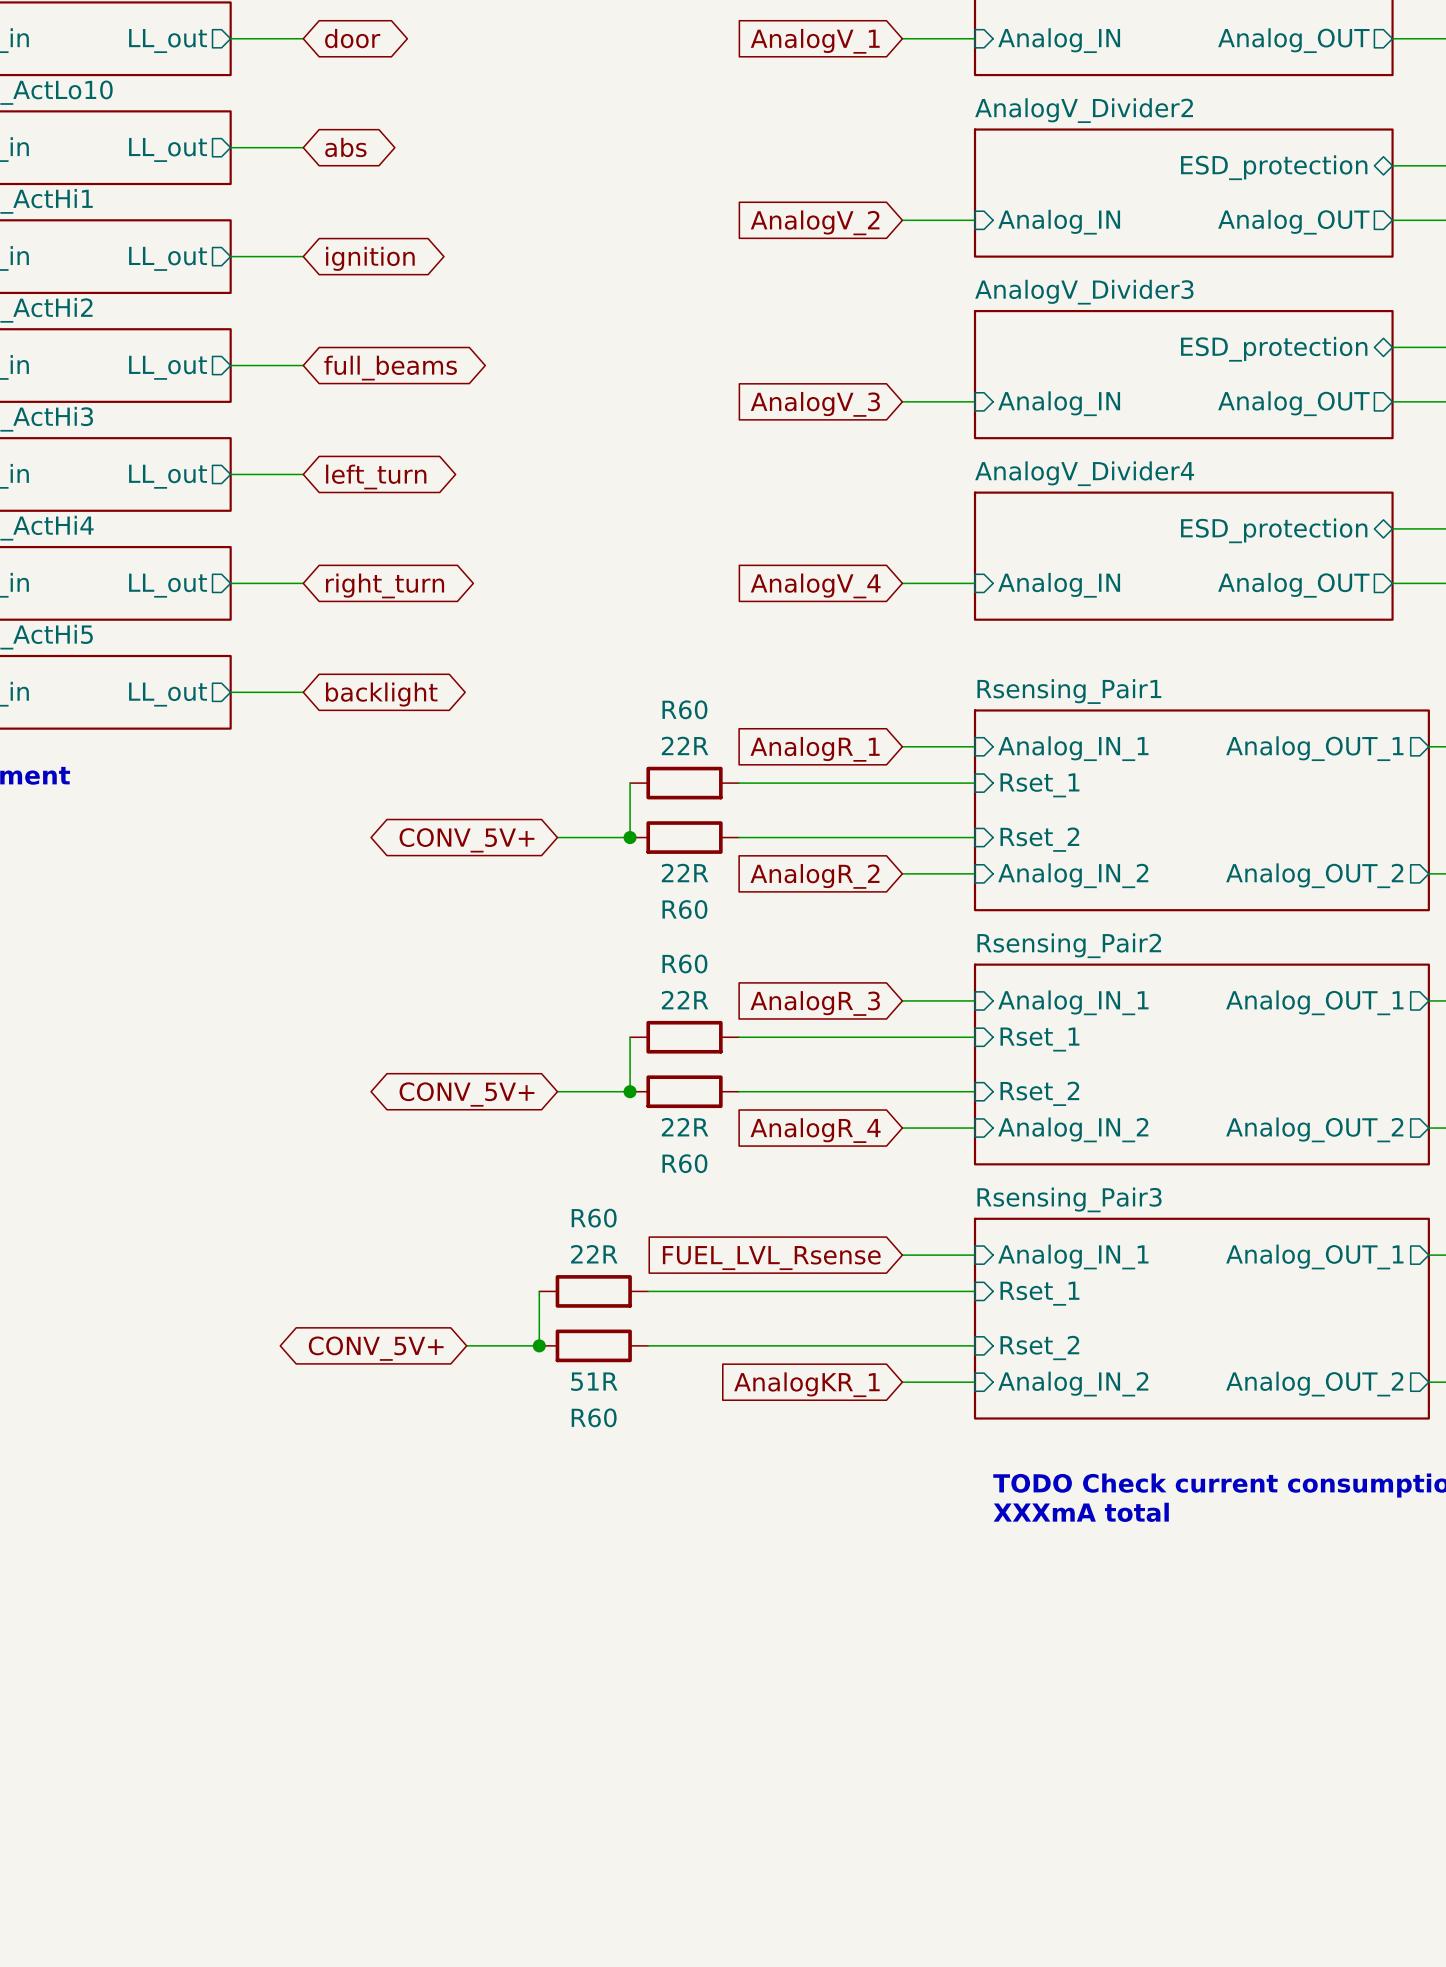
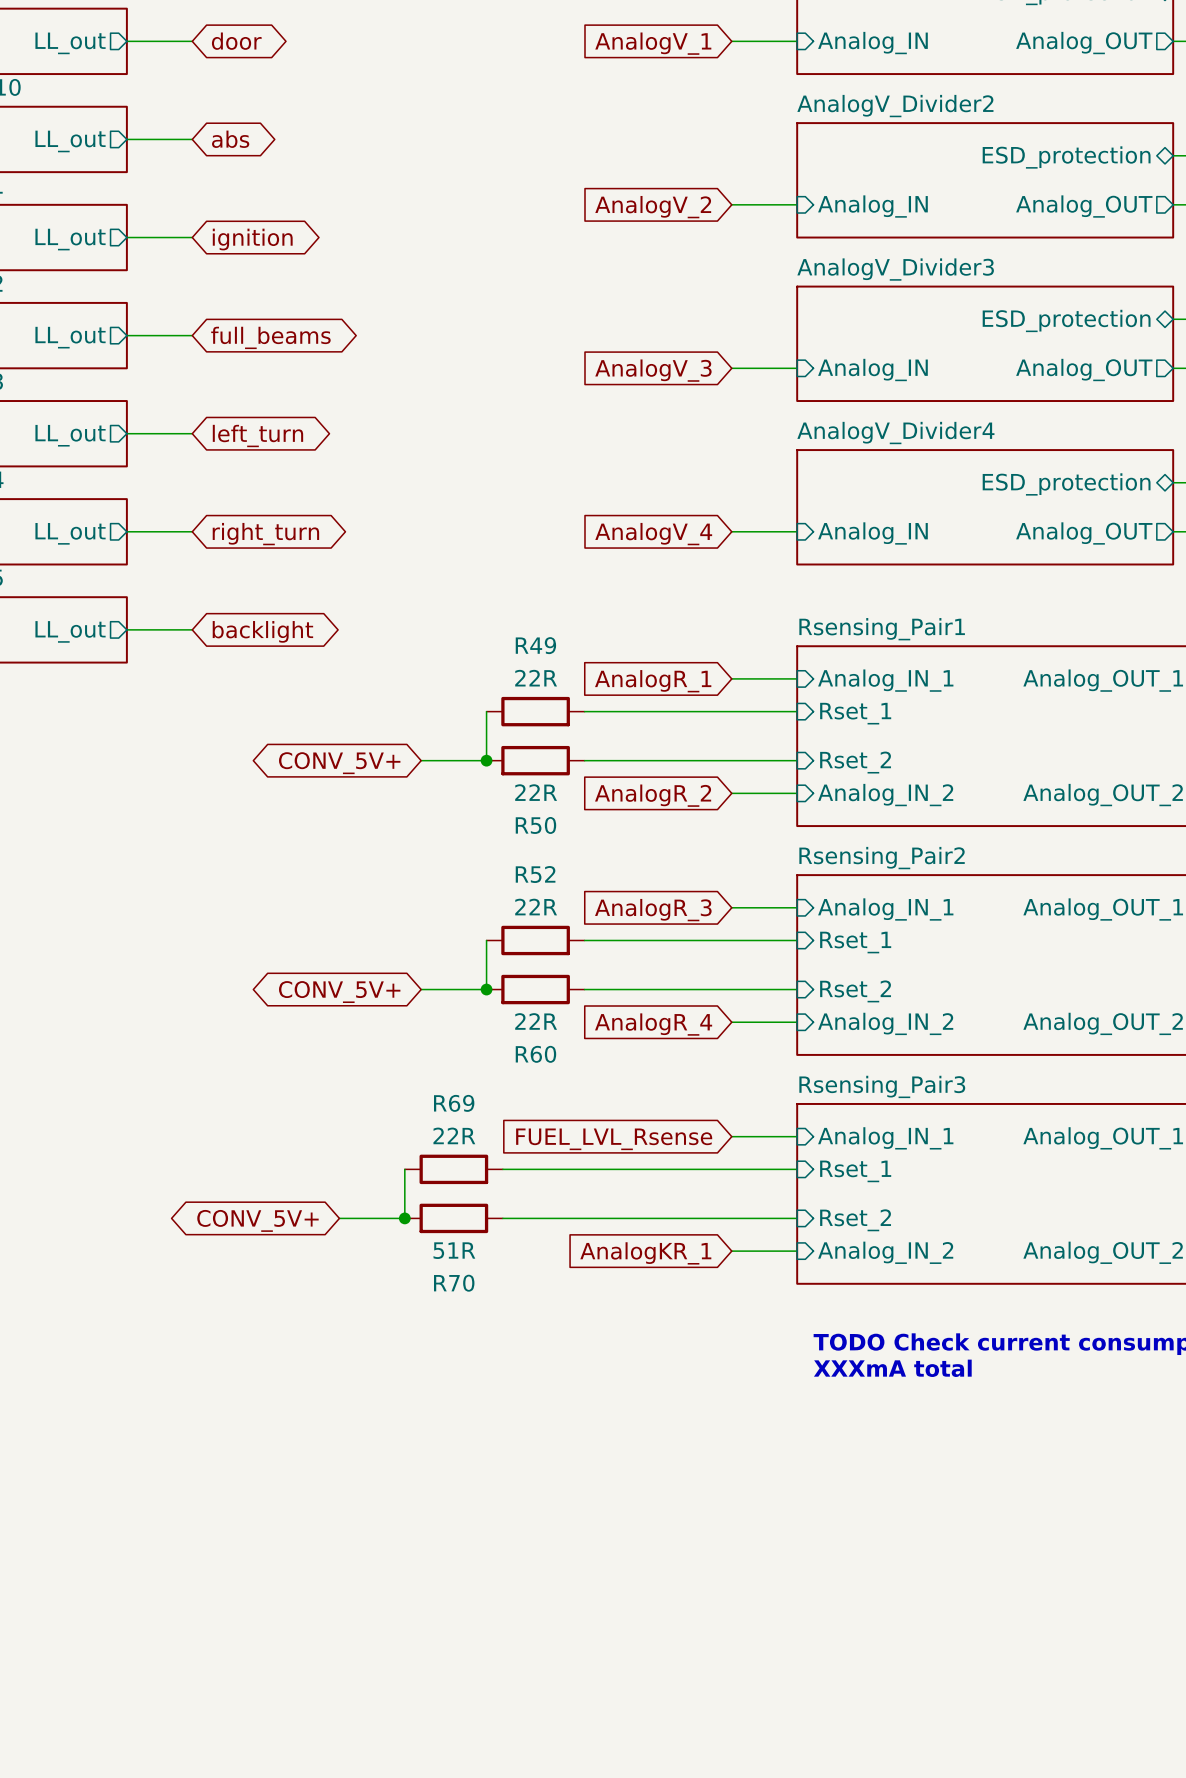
R60 name: R60 (684, 709) -> R49 (535, 645)
R60 name: R60 (684, 909) -> R50 (535, 825)
R60 name: R60 (684, 963) -> R52 (535, 874)
R60 name: R60 (594, 1218) -> R69 (454, 1103)
R60 name: R60 (594, 1417) -> R70 (454, 1283)

